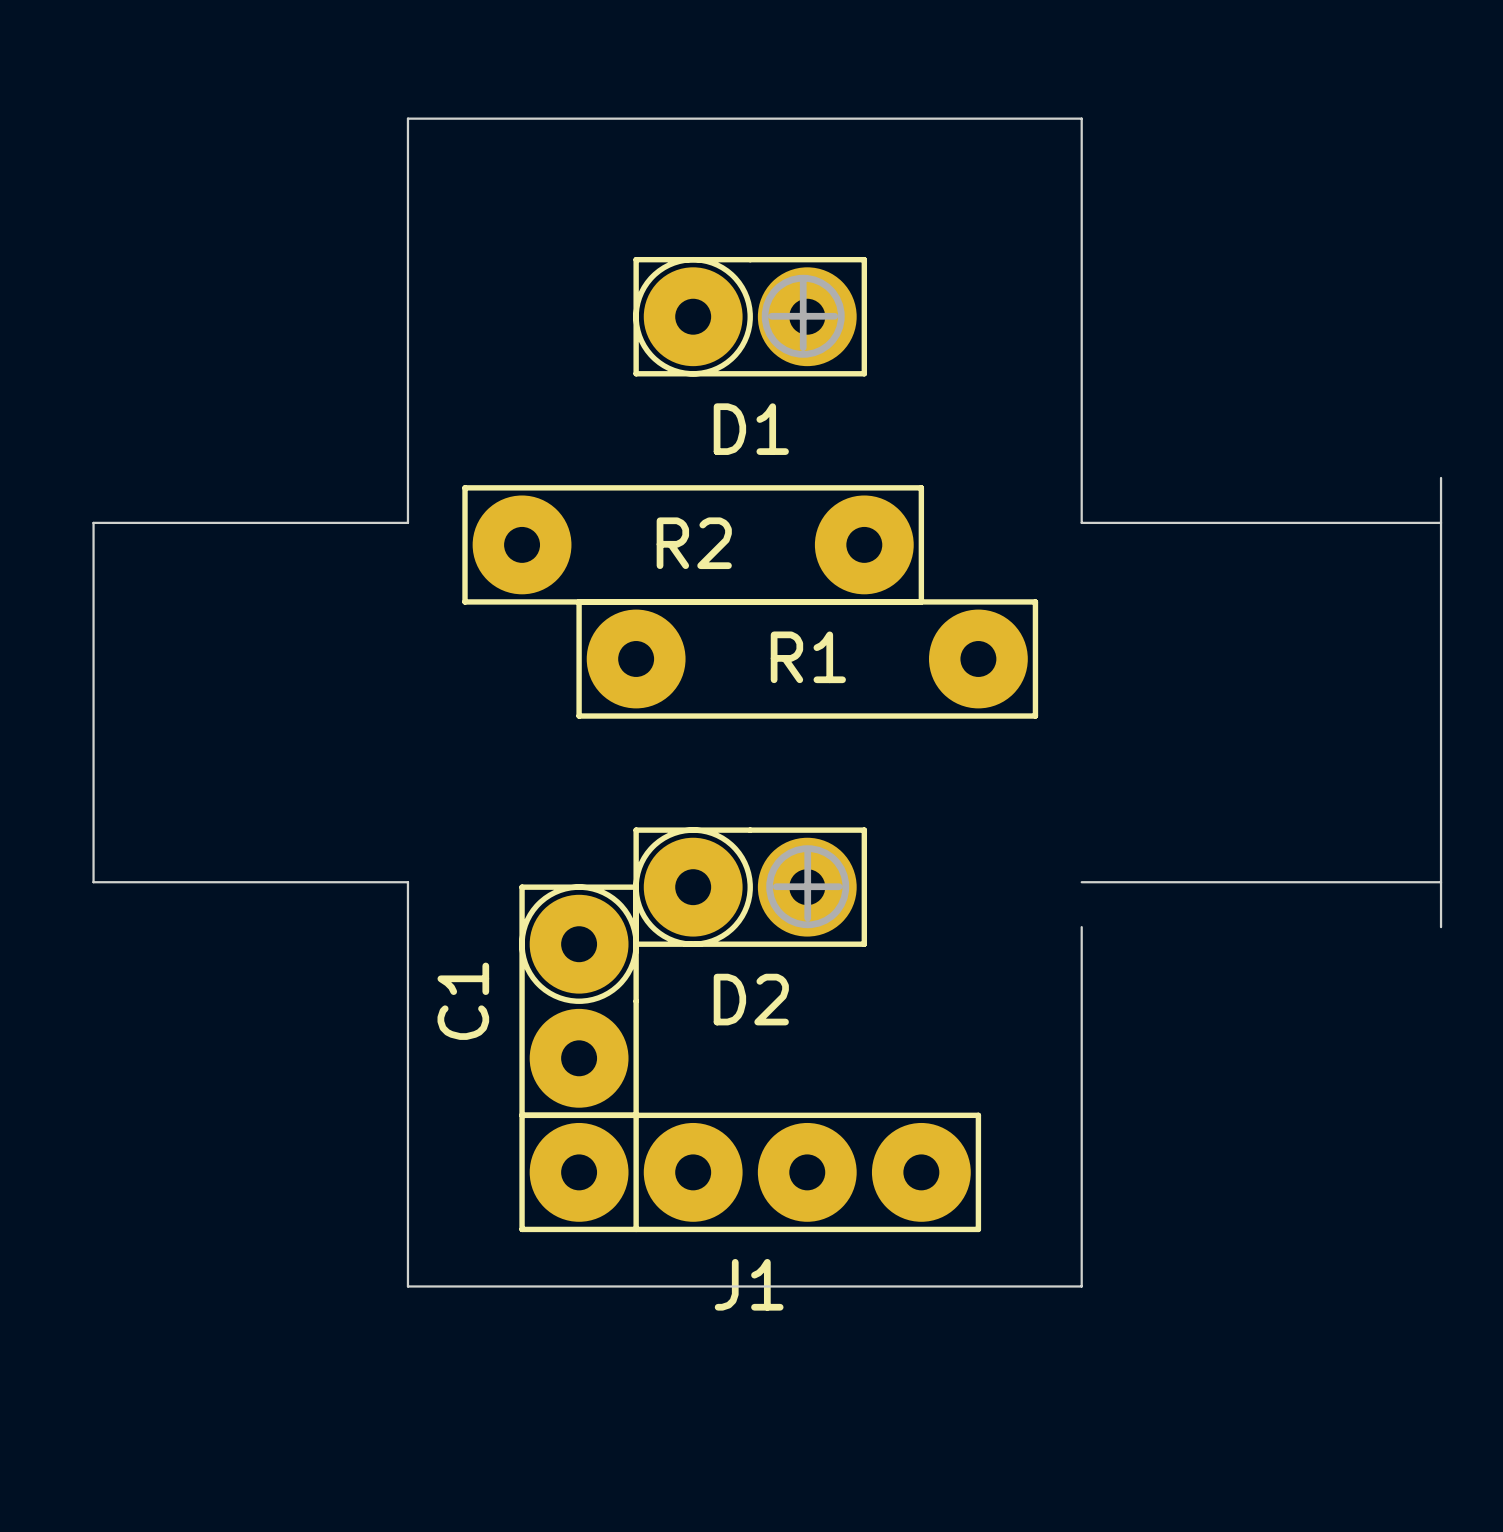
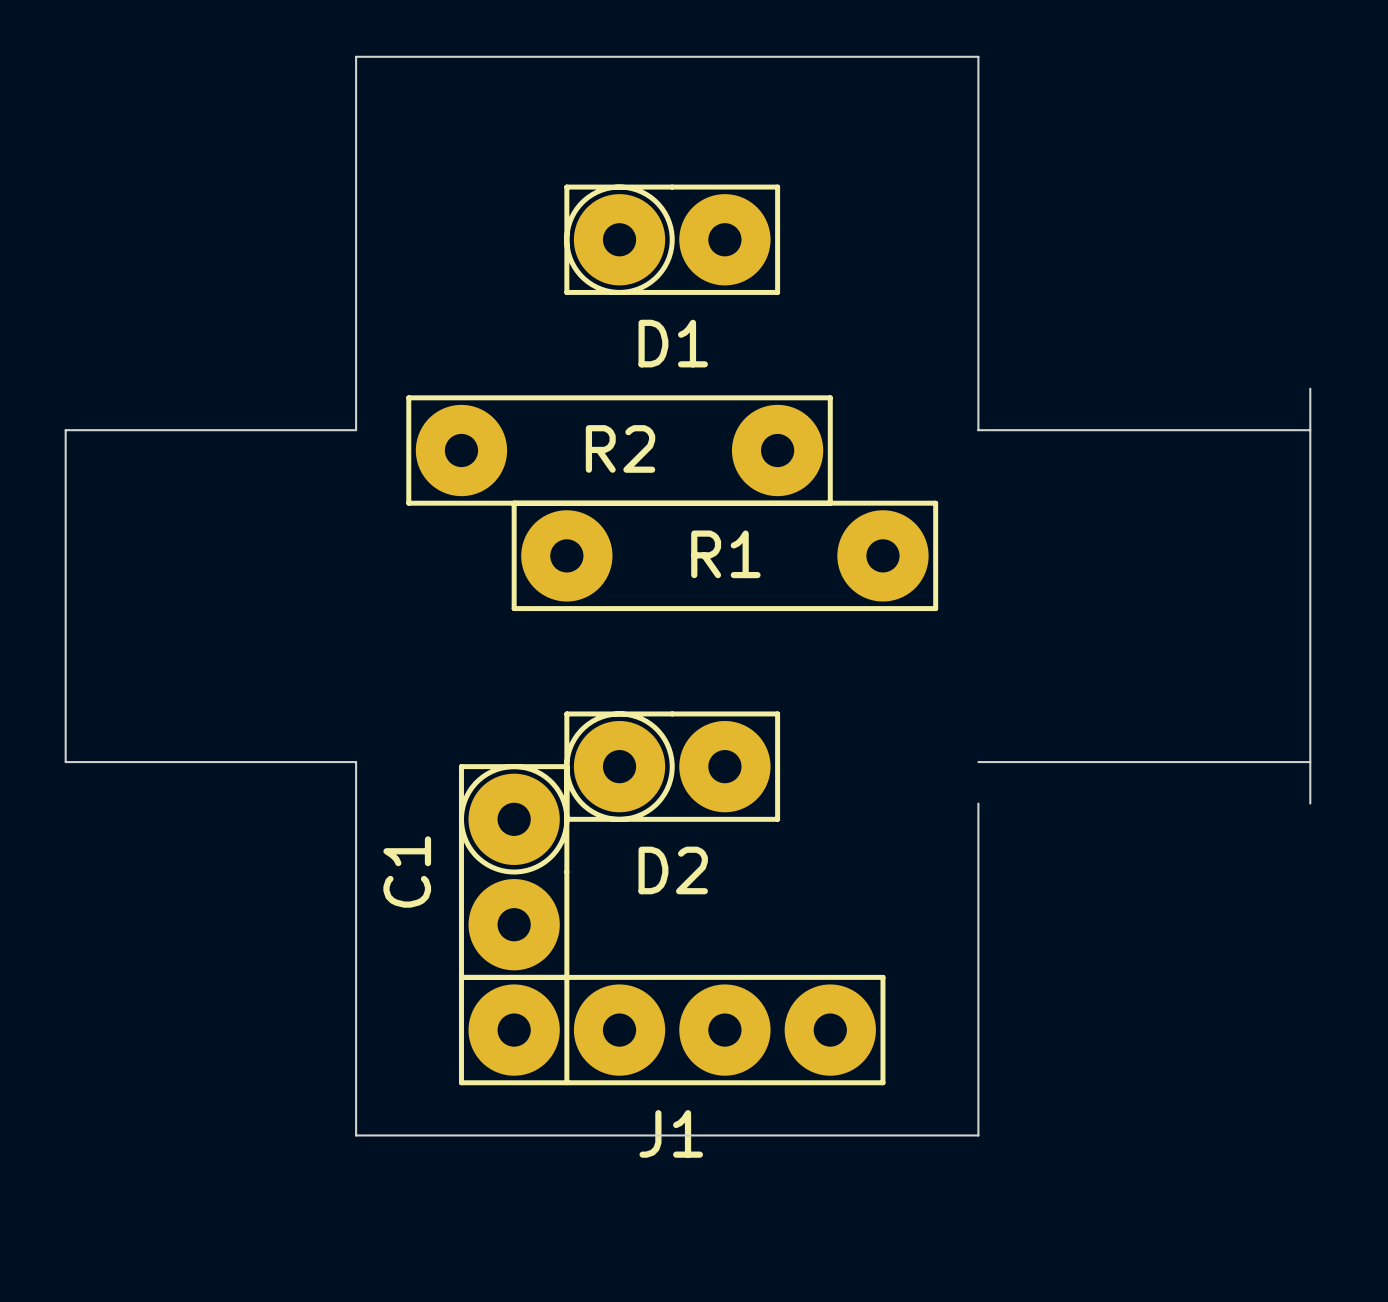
drawing: [761, 274, 845, 358] -> none
line: (803, 280) (803, 347) -> none
line: (771, 316) (834, 316) -> none
drawing: [766, 845, 850, 929] -> none
line: (807, 850) (807, 918) -> none
line: (776, 886) (839, 886) -> none

